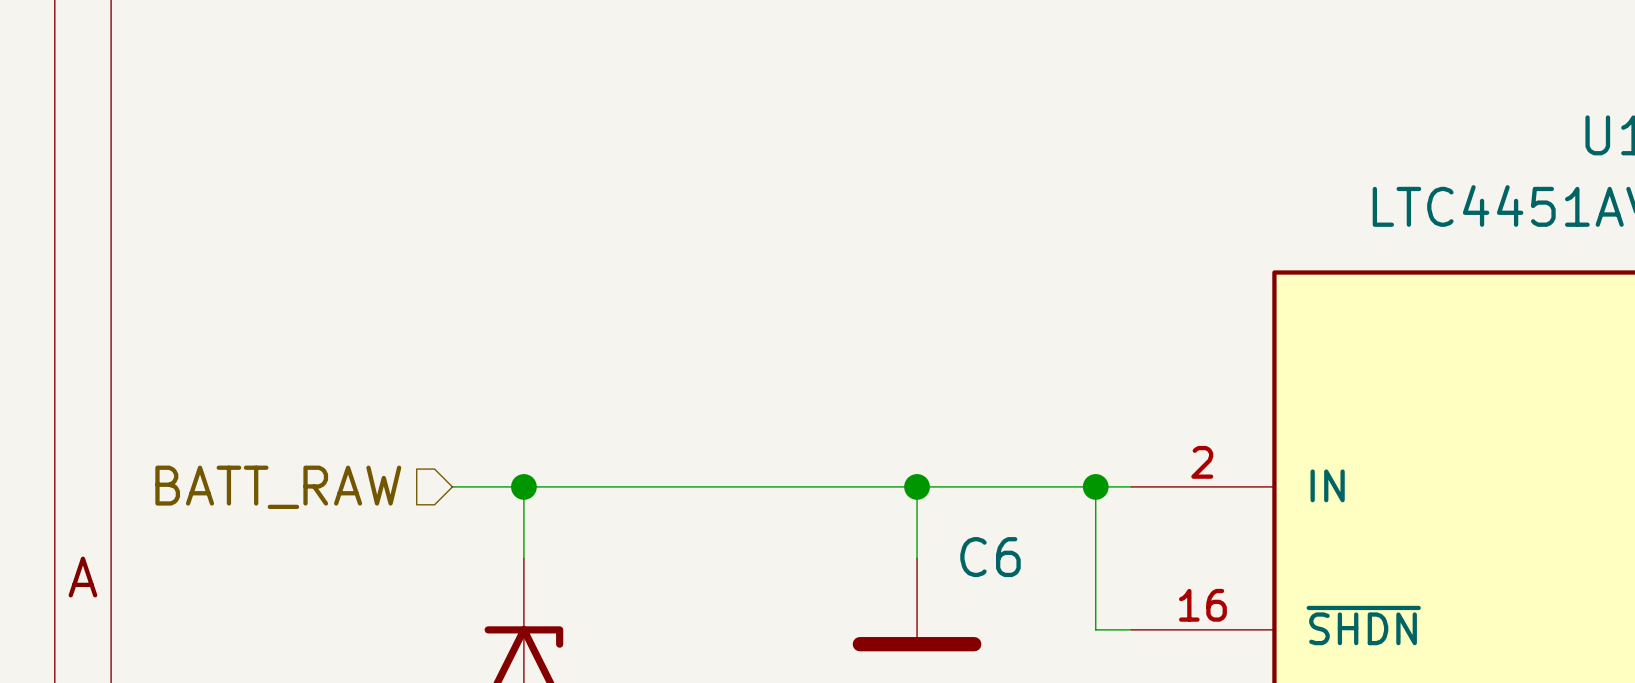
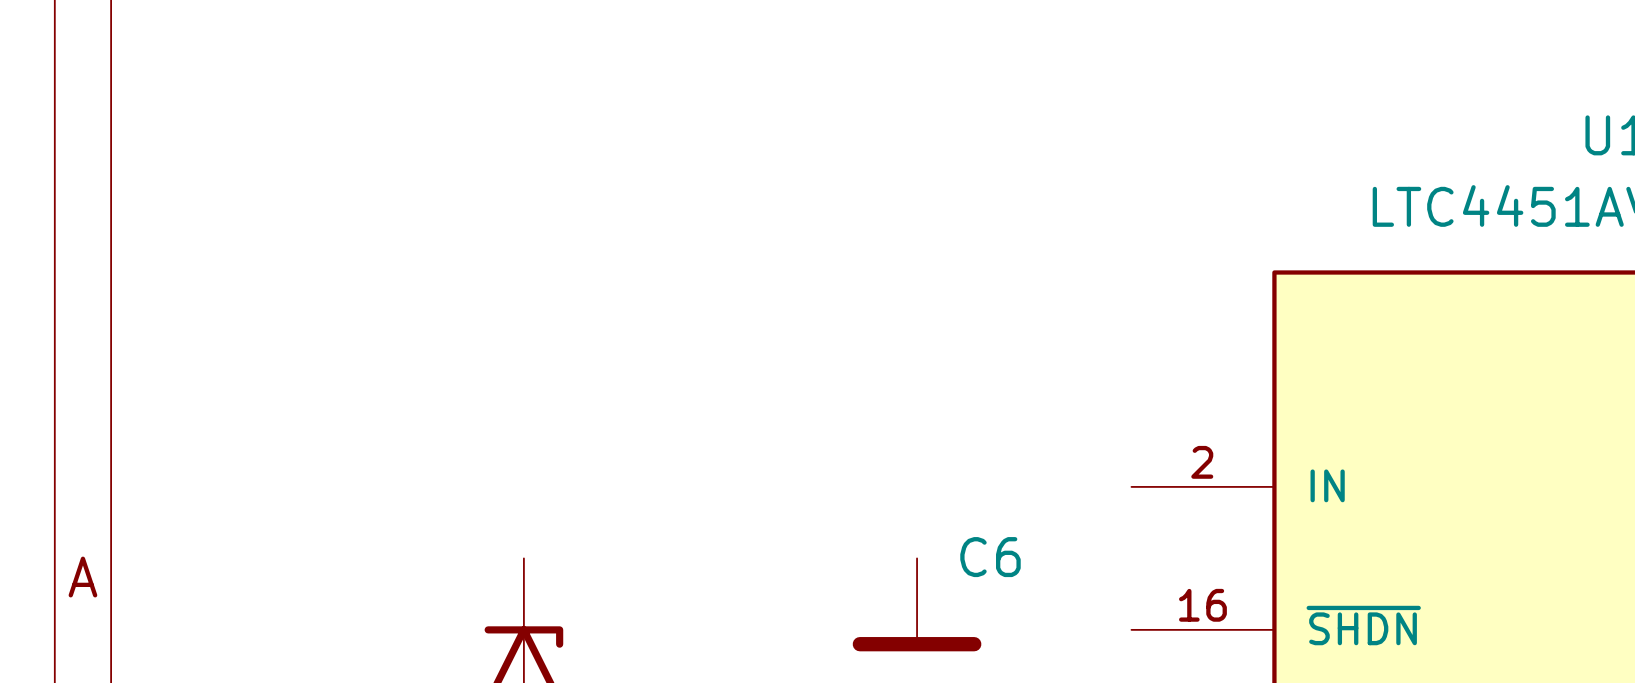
wire: (452, 486) (1131, 486) -> none
wire: (523, 486) (523, 558) -> none
junction: (523, 486) -> none
wire: (917, 486) (917, 558) -> none
junction: (917, 486) -> none
wire: (1095, 486) (1095, 629) (1131, 629) -> none
junction: (1095, 486) -> none
hierarchical label: BATT_RAW (278, 487) -> none

